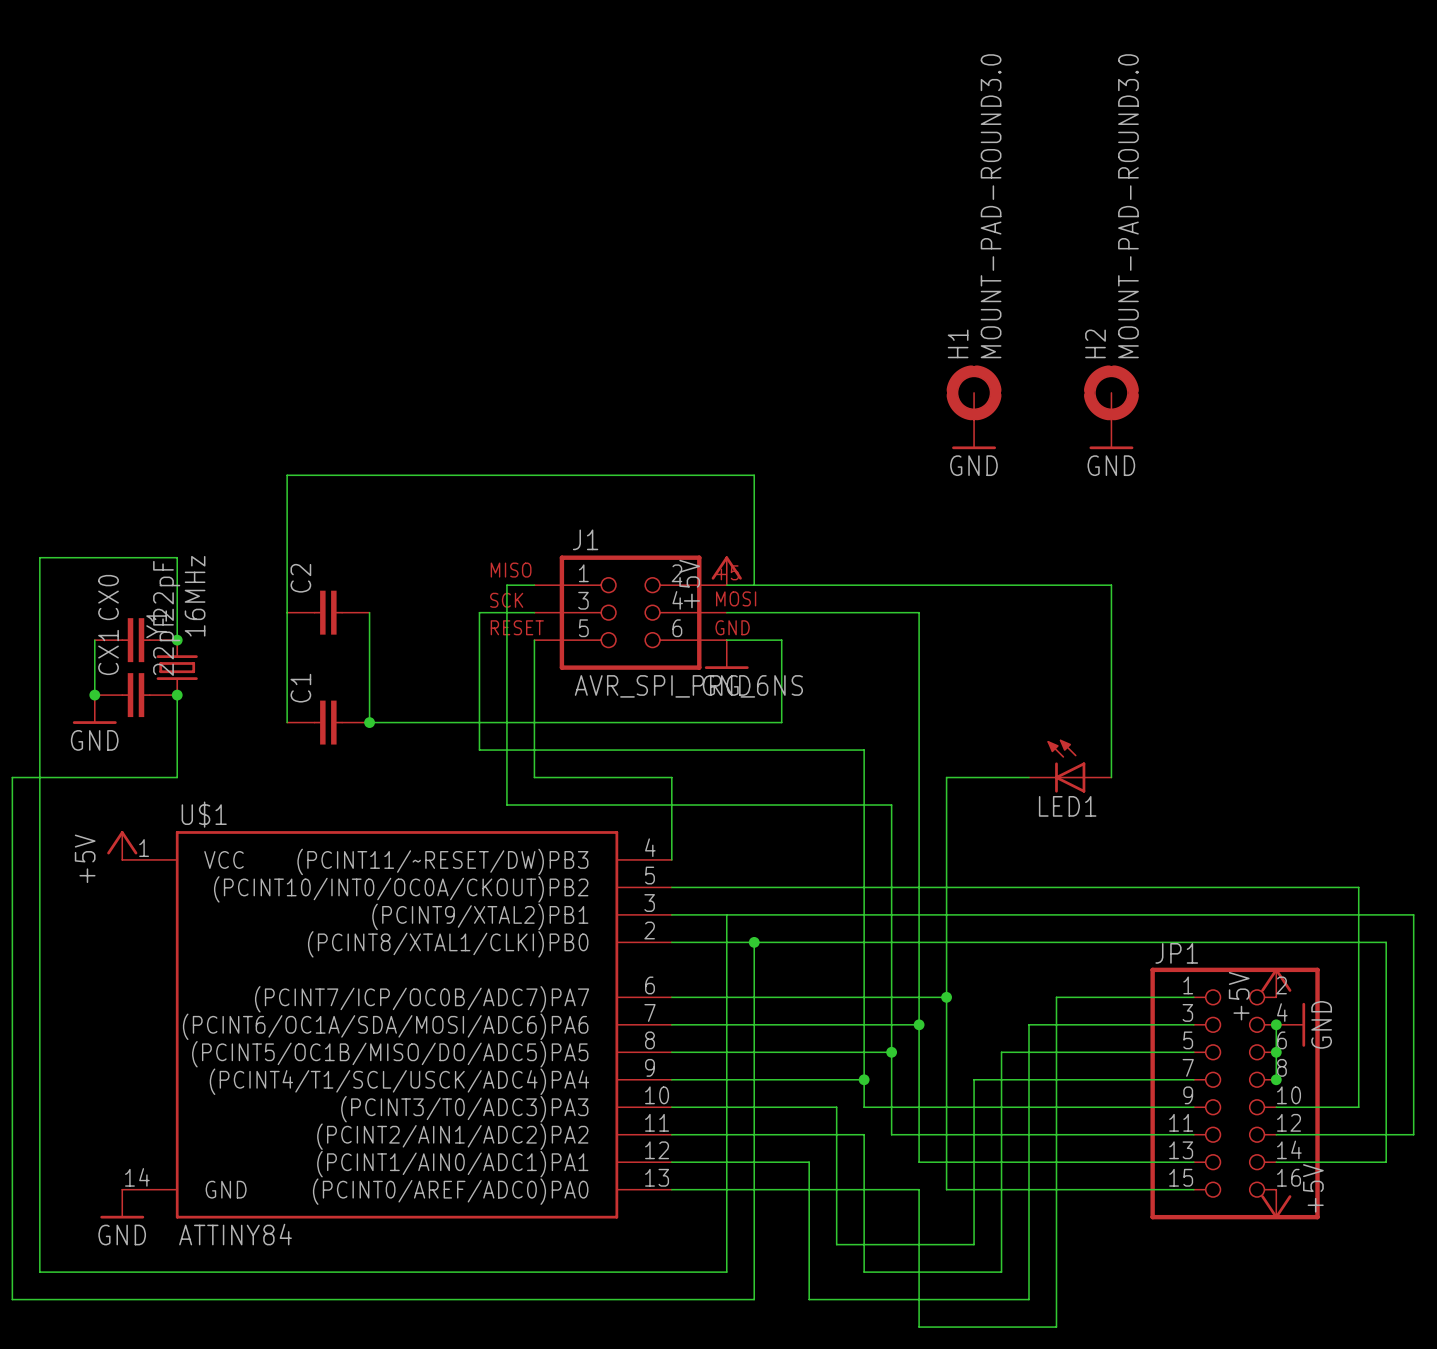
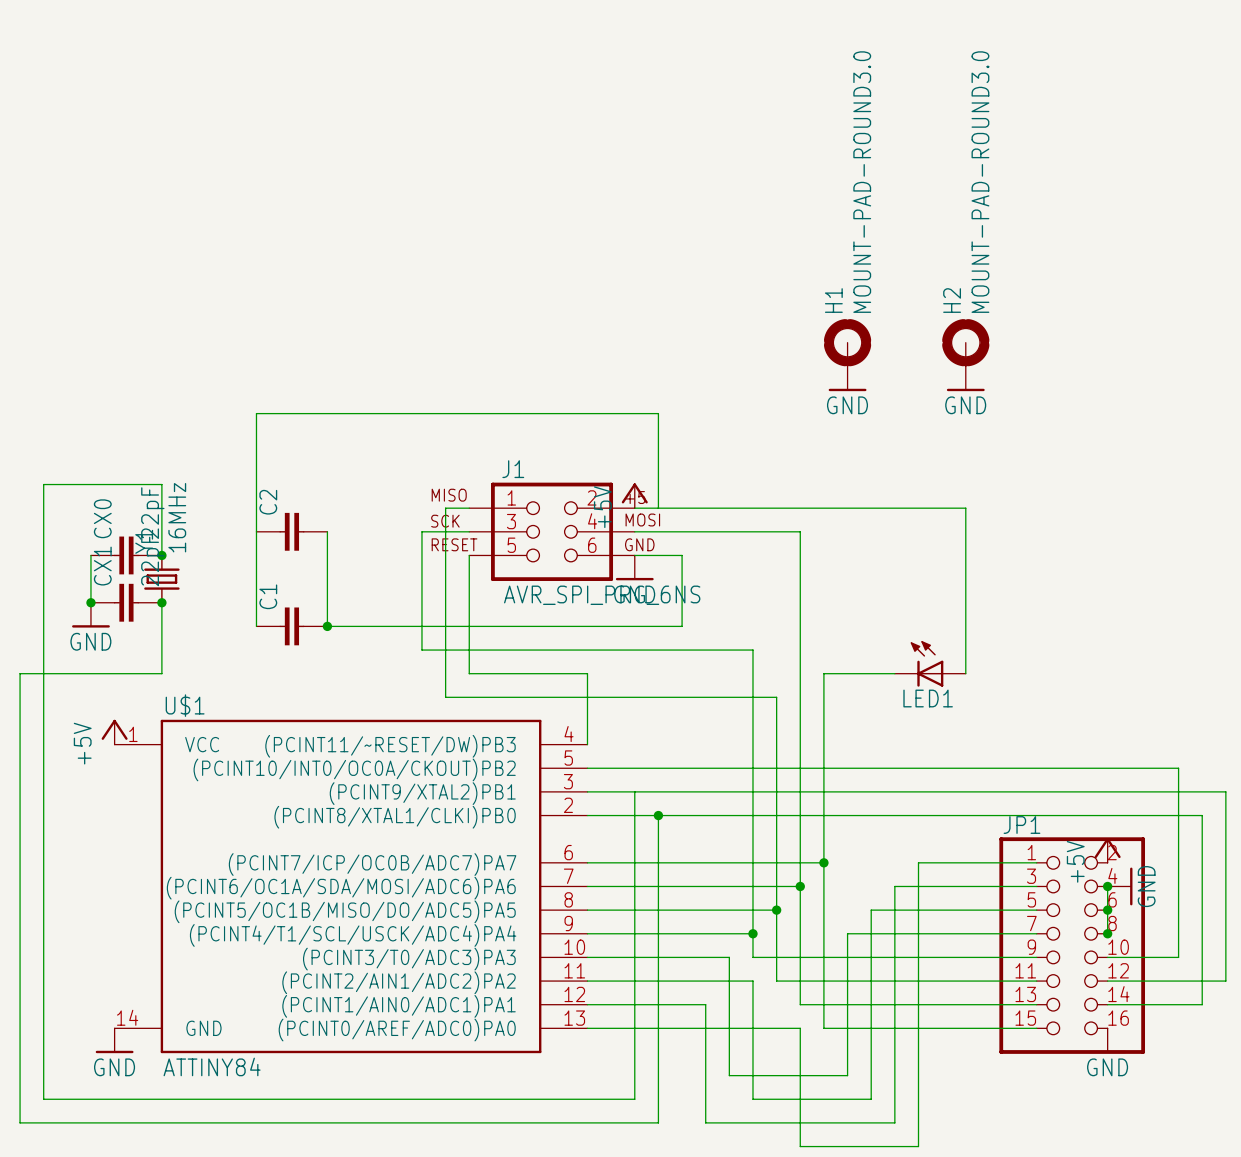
power symbol: +5V (1276, 1204) -> GND (1107, 1040)

